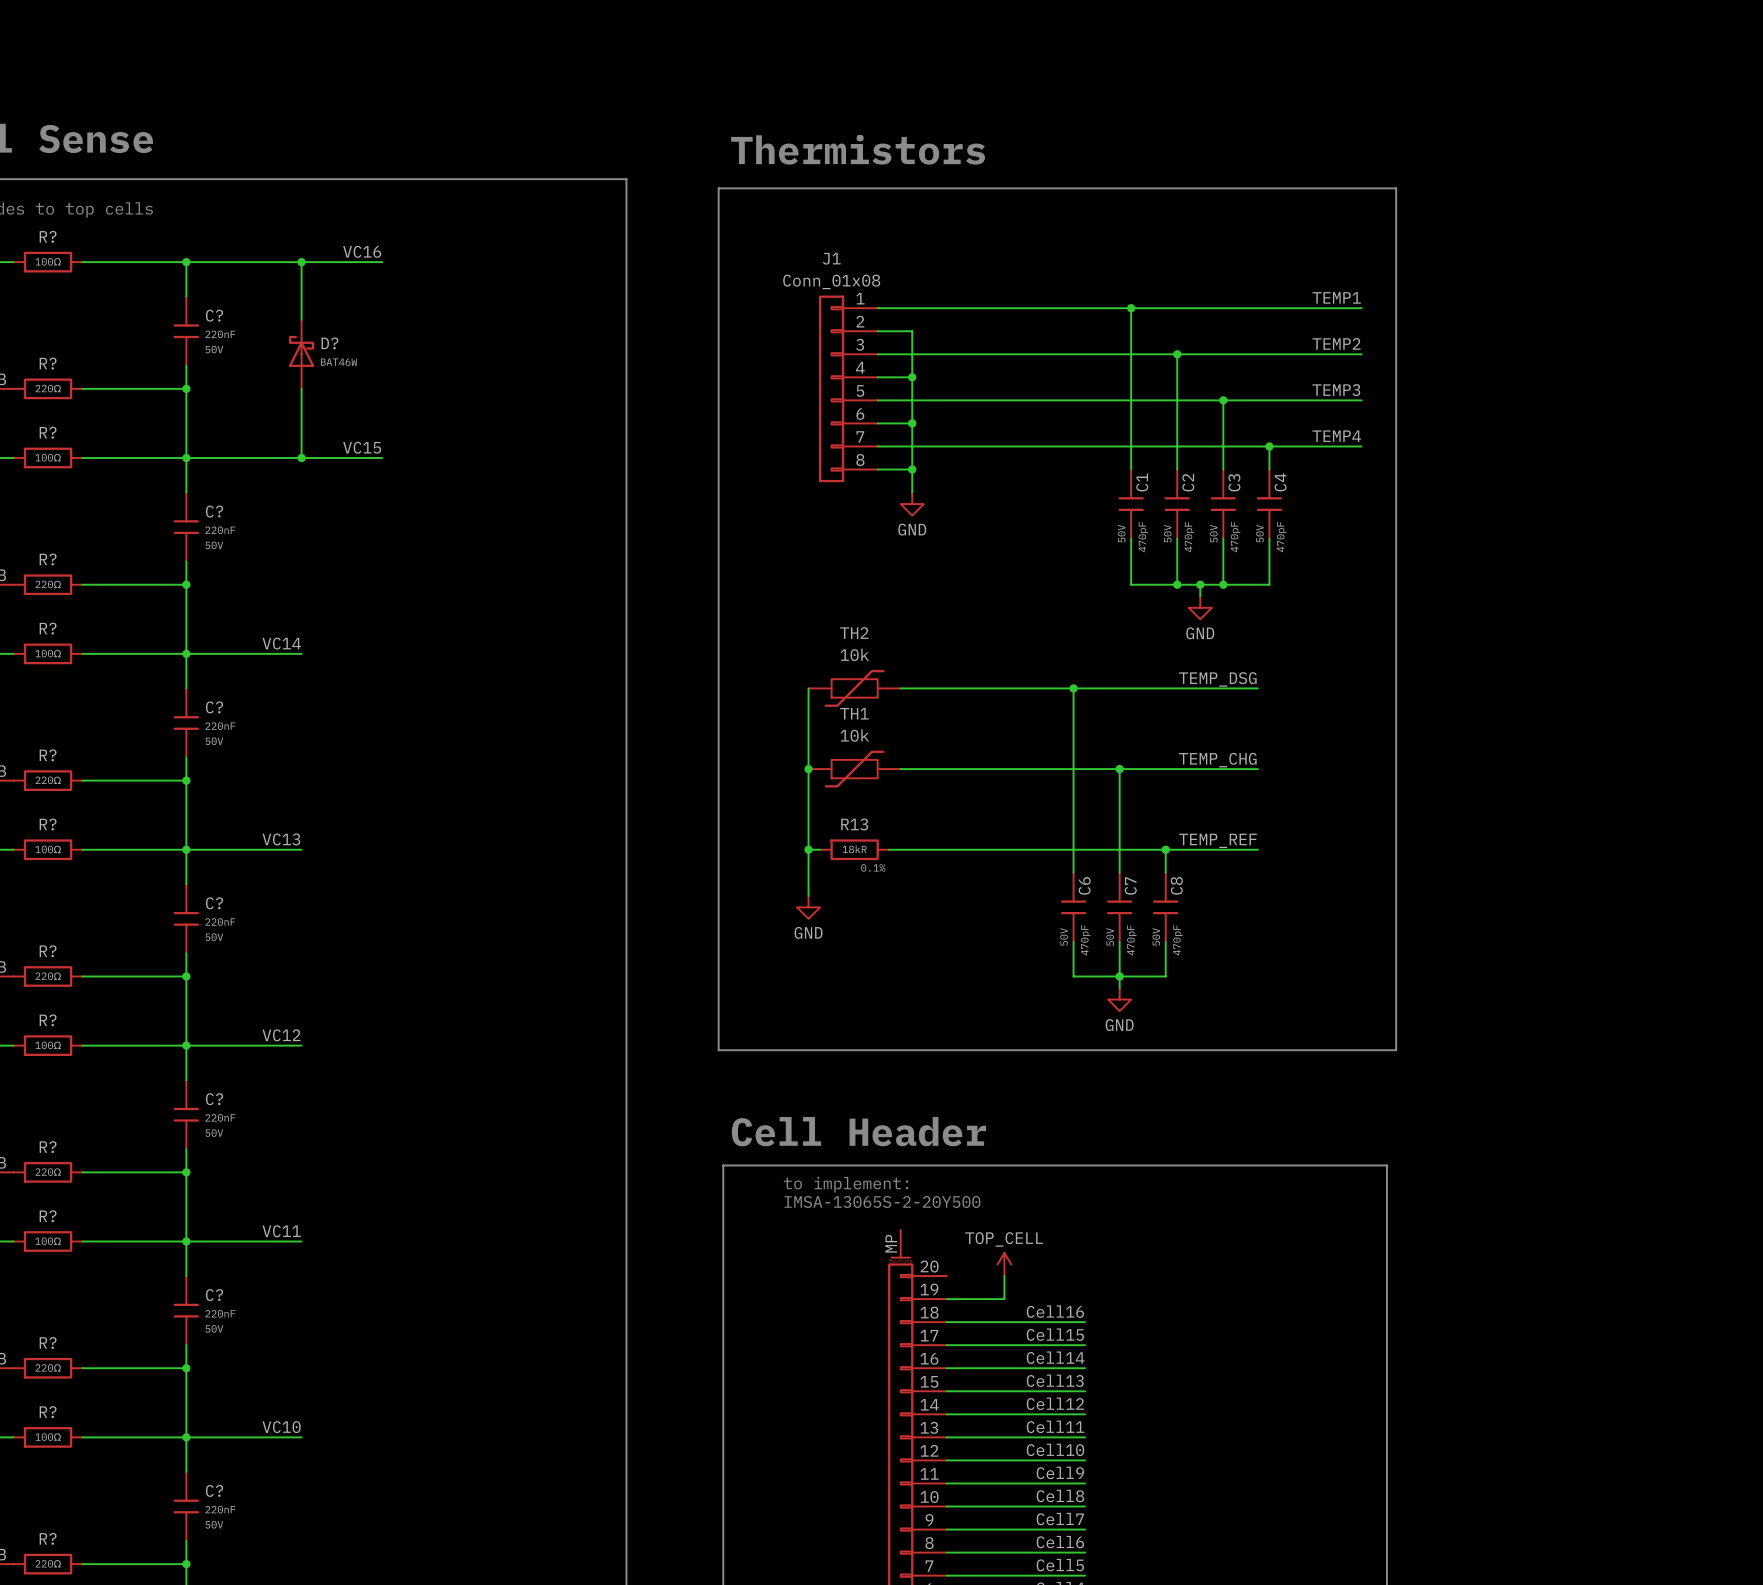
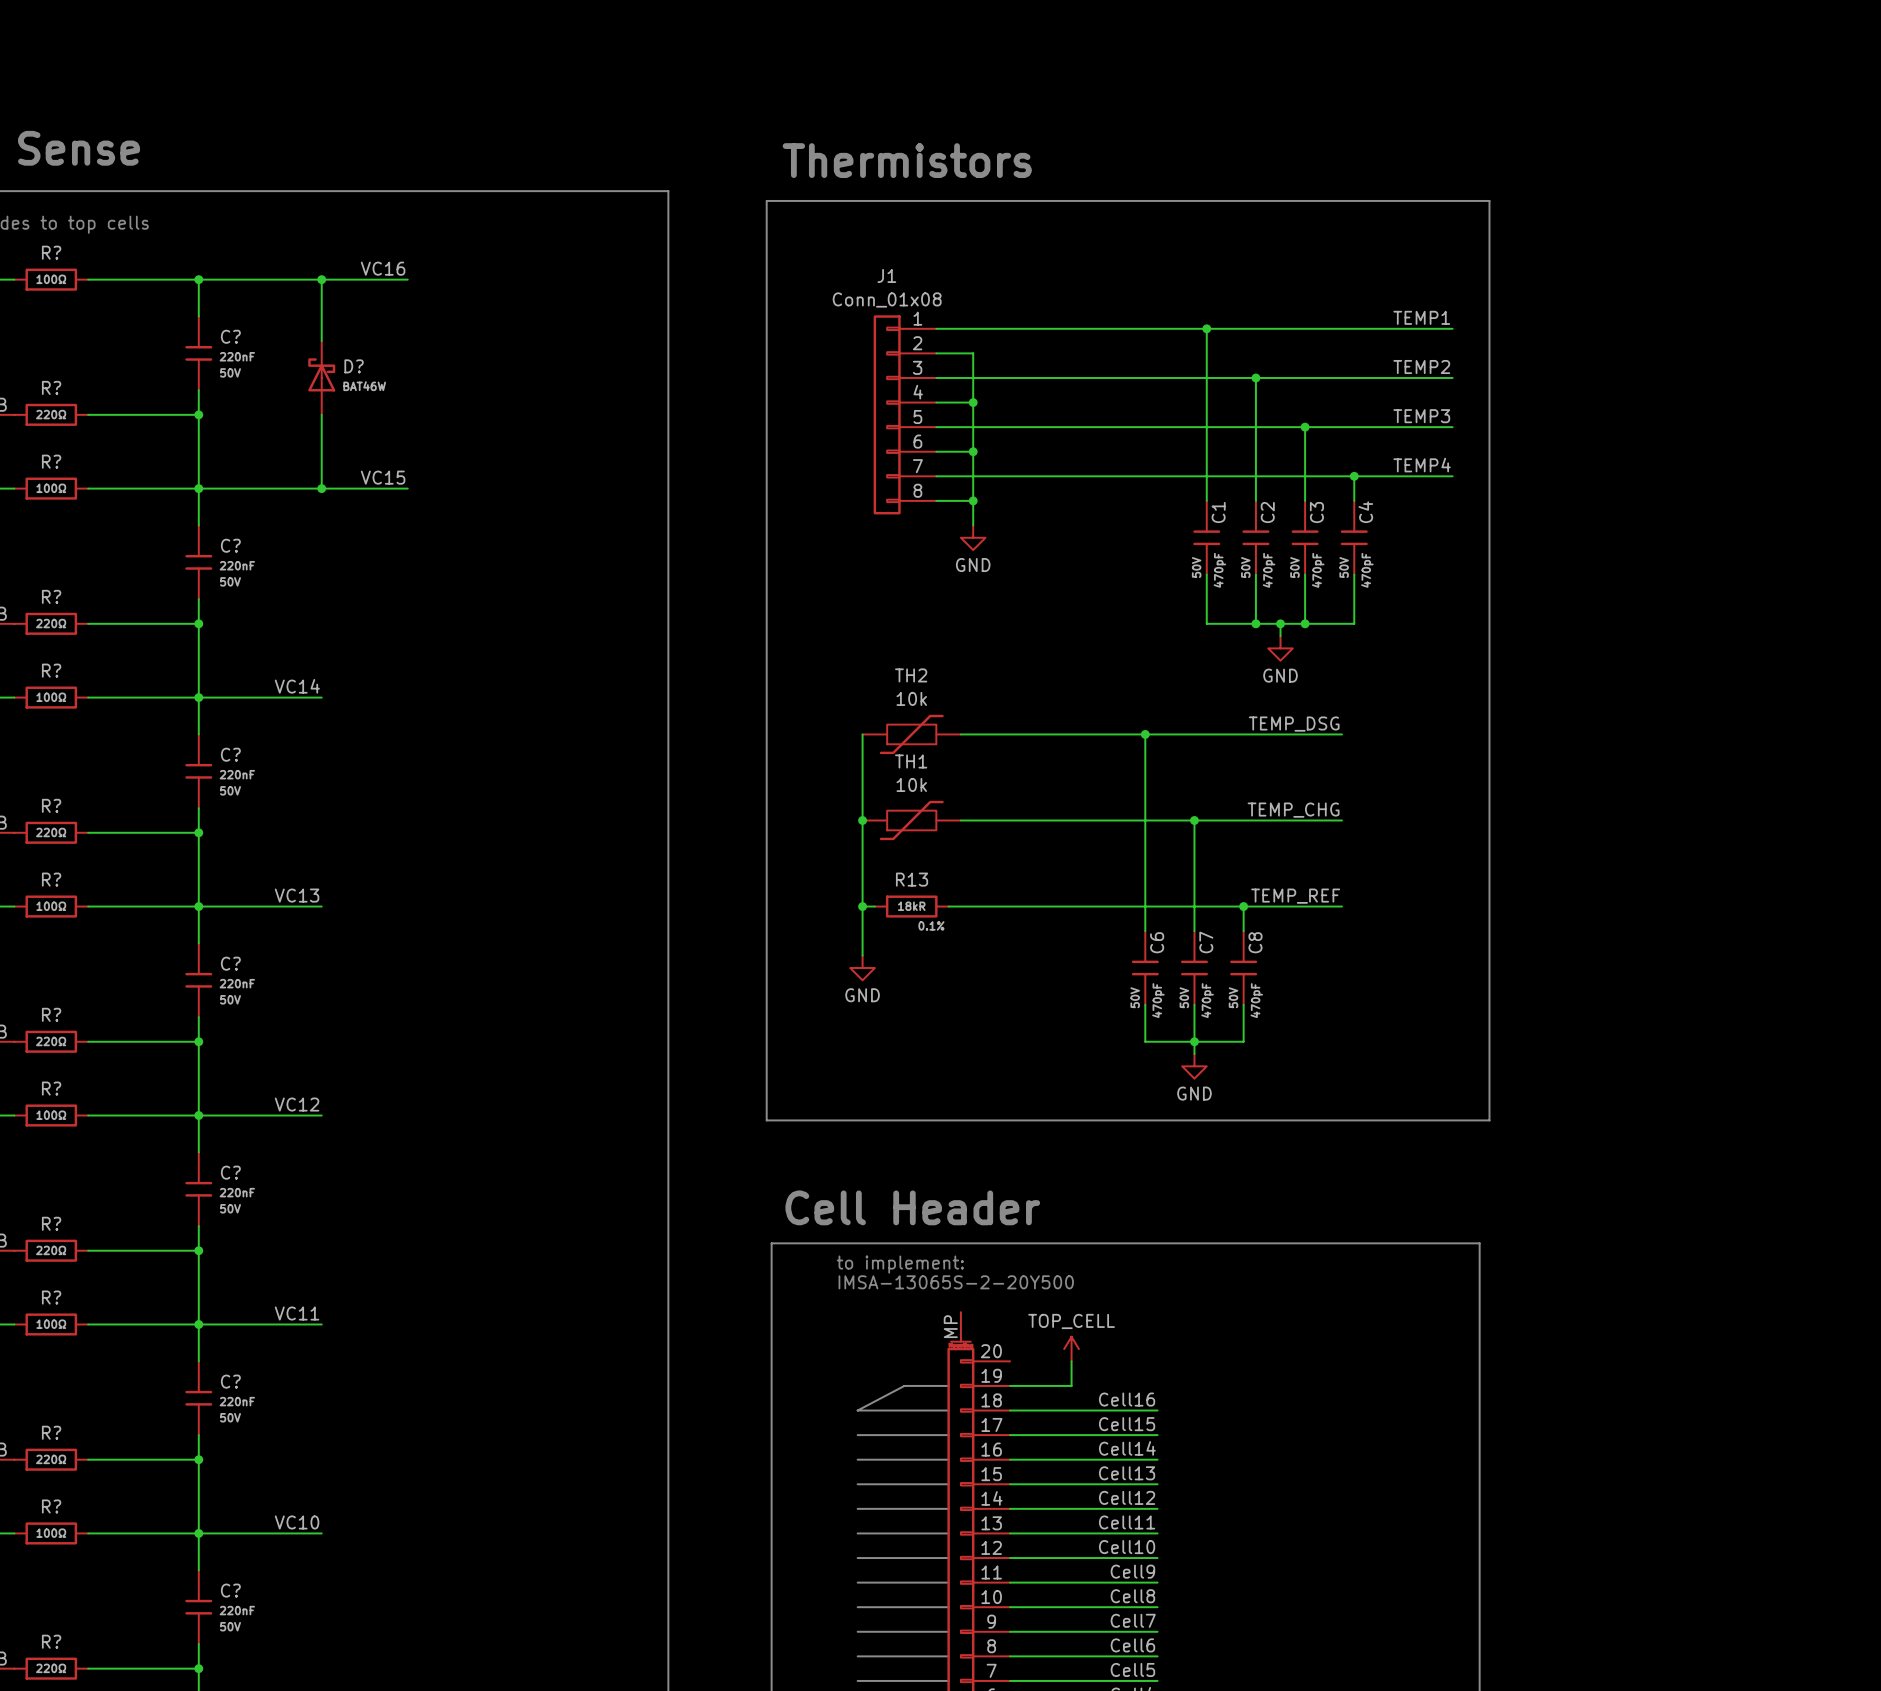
line: none -> (948, 1385) (904, 1385) (857, 1410) (948, 1410)
line: none -> (857, 1435) (948, 1435)
line: none -> (857, 1459) (948, 1459)
line: none -> (857, 1484) (948, 1484)
line: none -> (857, 1508) (948, 1508)
line: none -> (857, 1533) (948, 1533)
line: none -> (857, 1558) (948, 1558)
line: none -> (857, 1582) (948, 1582)
line: none -> (857, 1607) (948, 1607)
line: none -> (857, 1631) (948, 1631)
line: none -> (857, 1656) (948, 1656)
line: none -> (857, 1680) (948, 1680)

